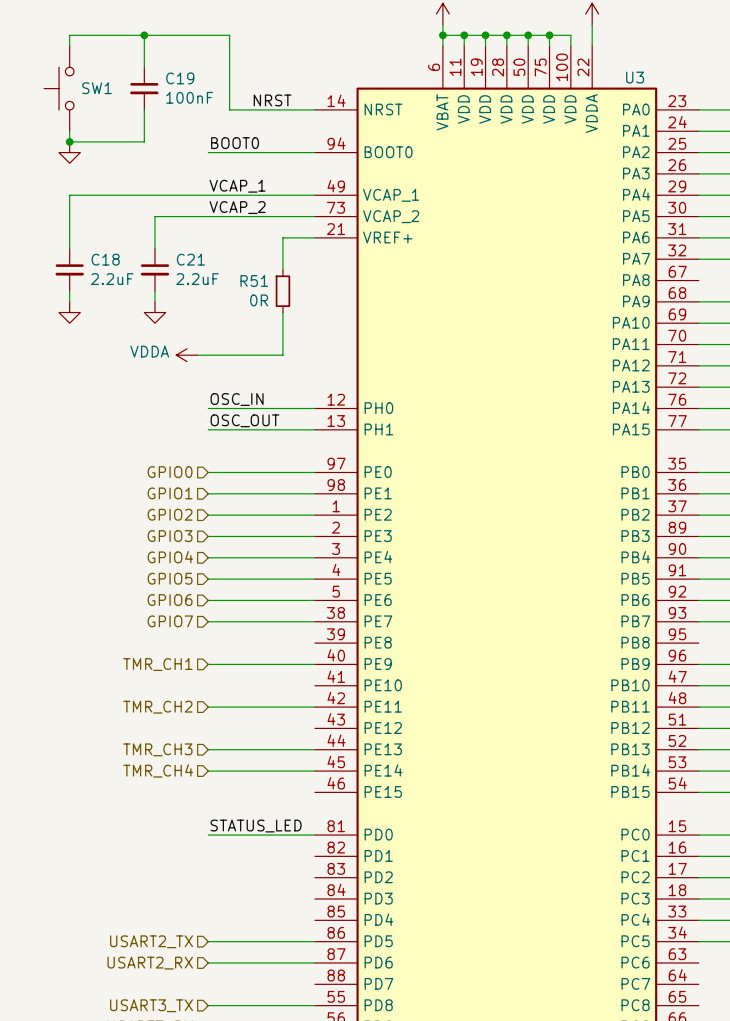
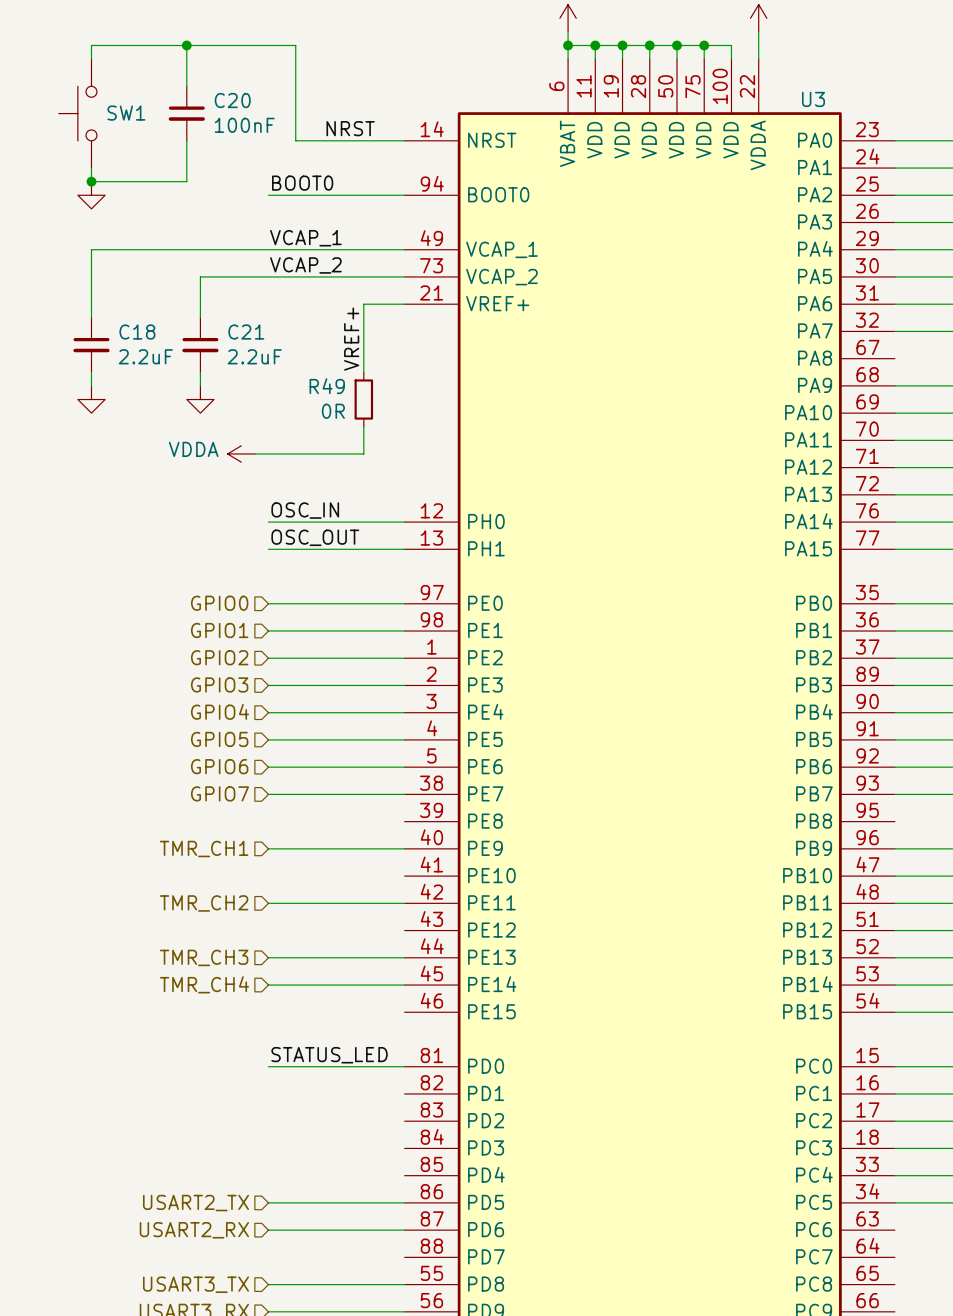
C19 name: C19 (180, 78) -> C20 (232, 100)
label: none -> VREF+ (351, 339)
R51: 0R (282, 291) -> none
wire: (282, 312) (282, 333) -> (363, 345) (363, 372)
R49: none -> 0R (363, 399)

